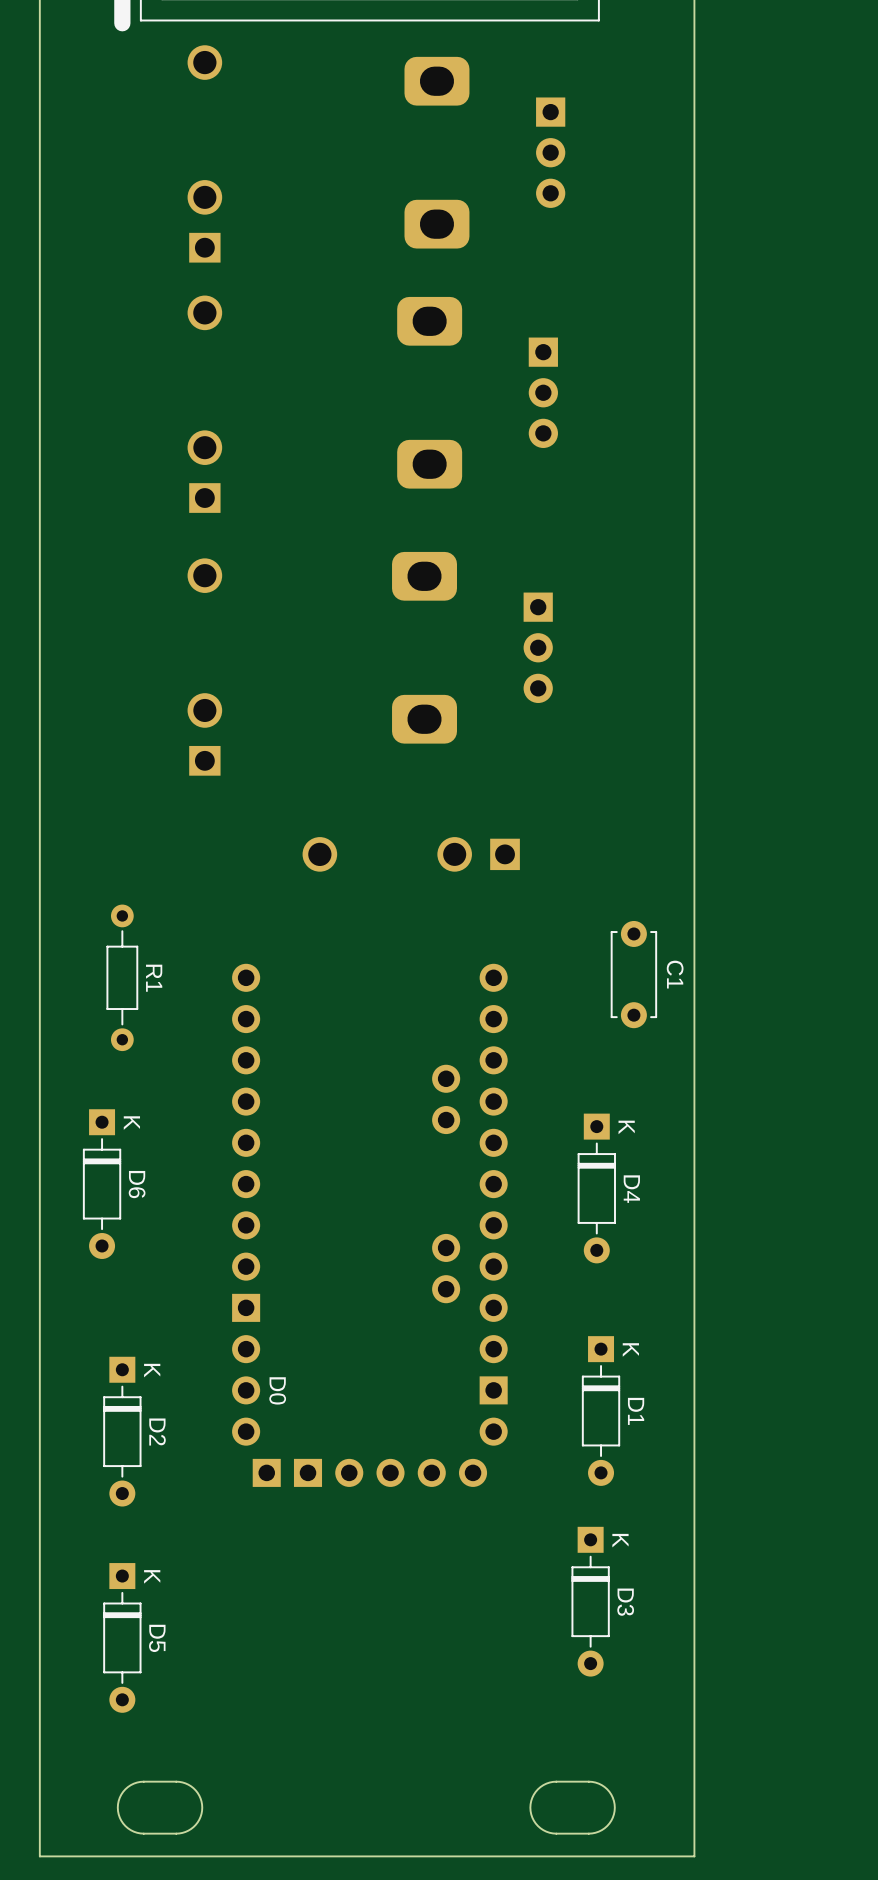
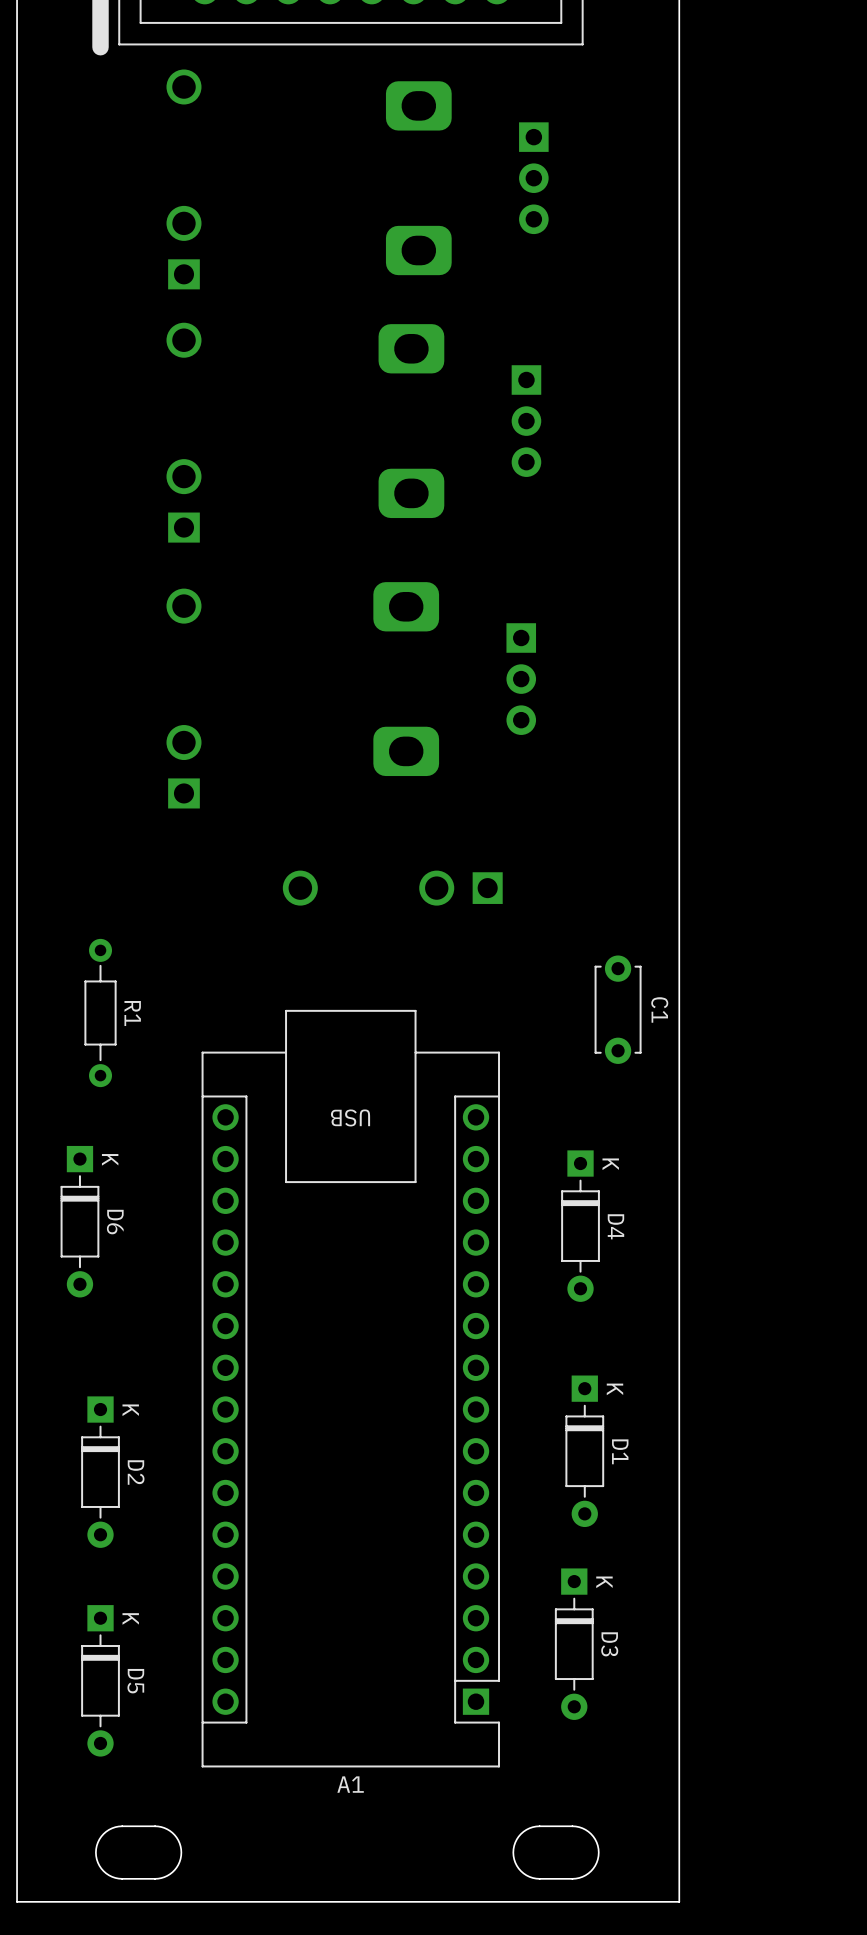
part: (369, 1225) -> none
A1: none -> (350, 1388)

